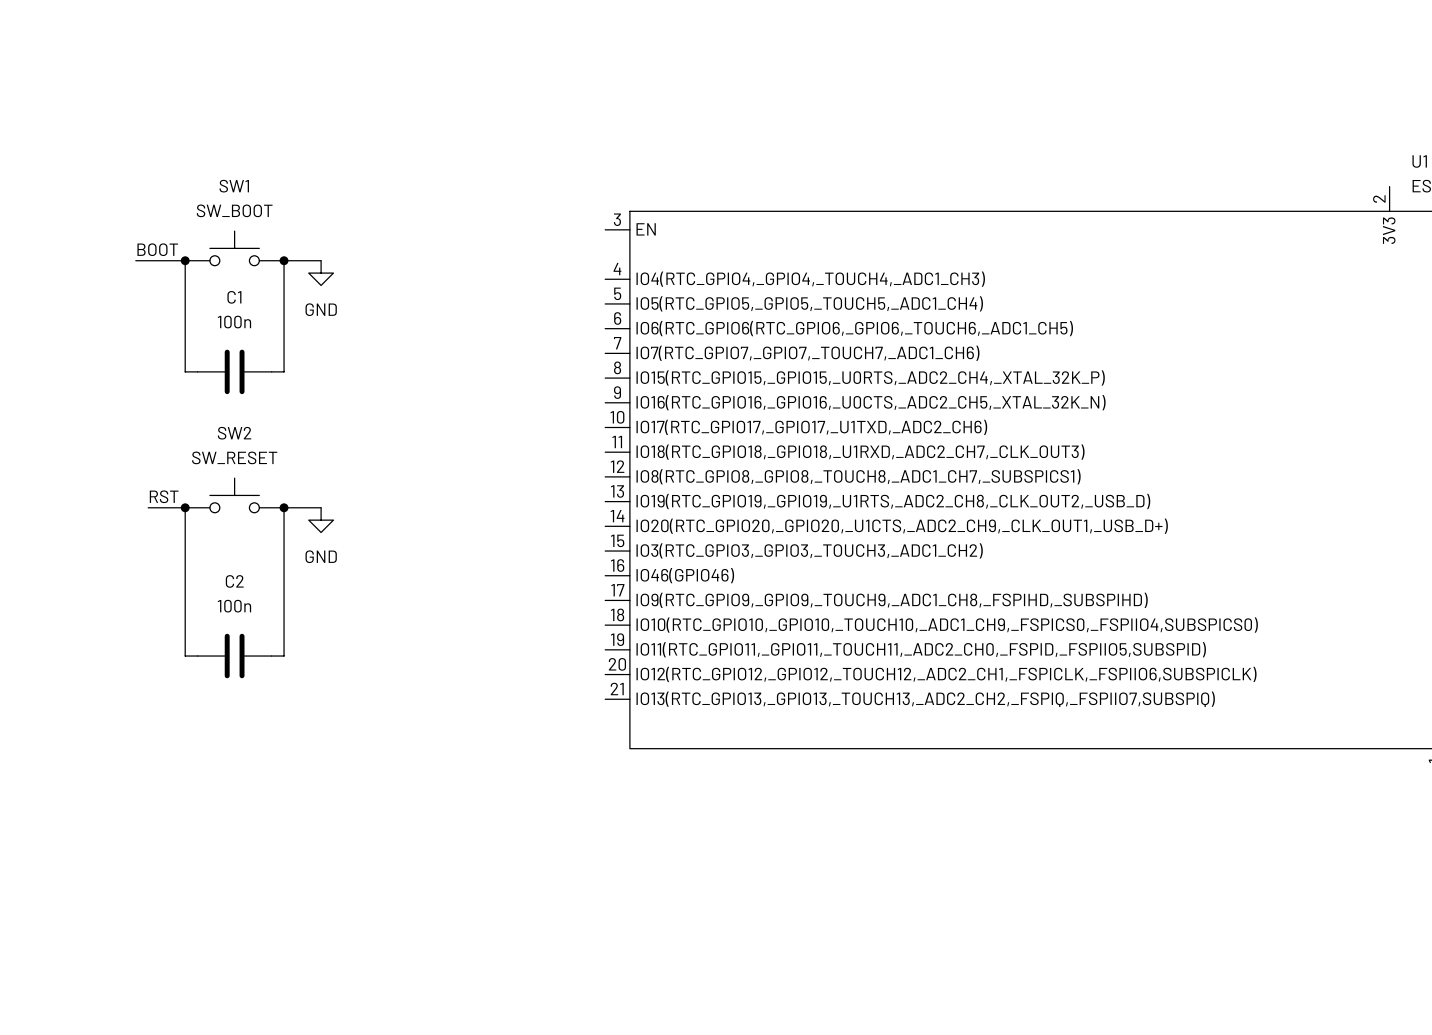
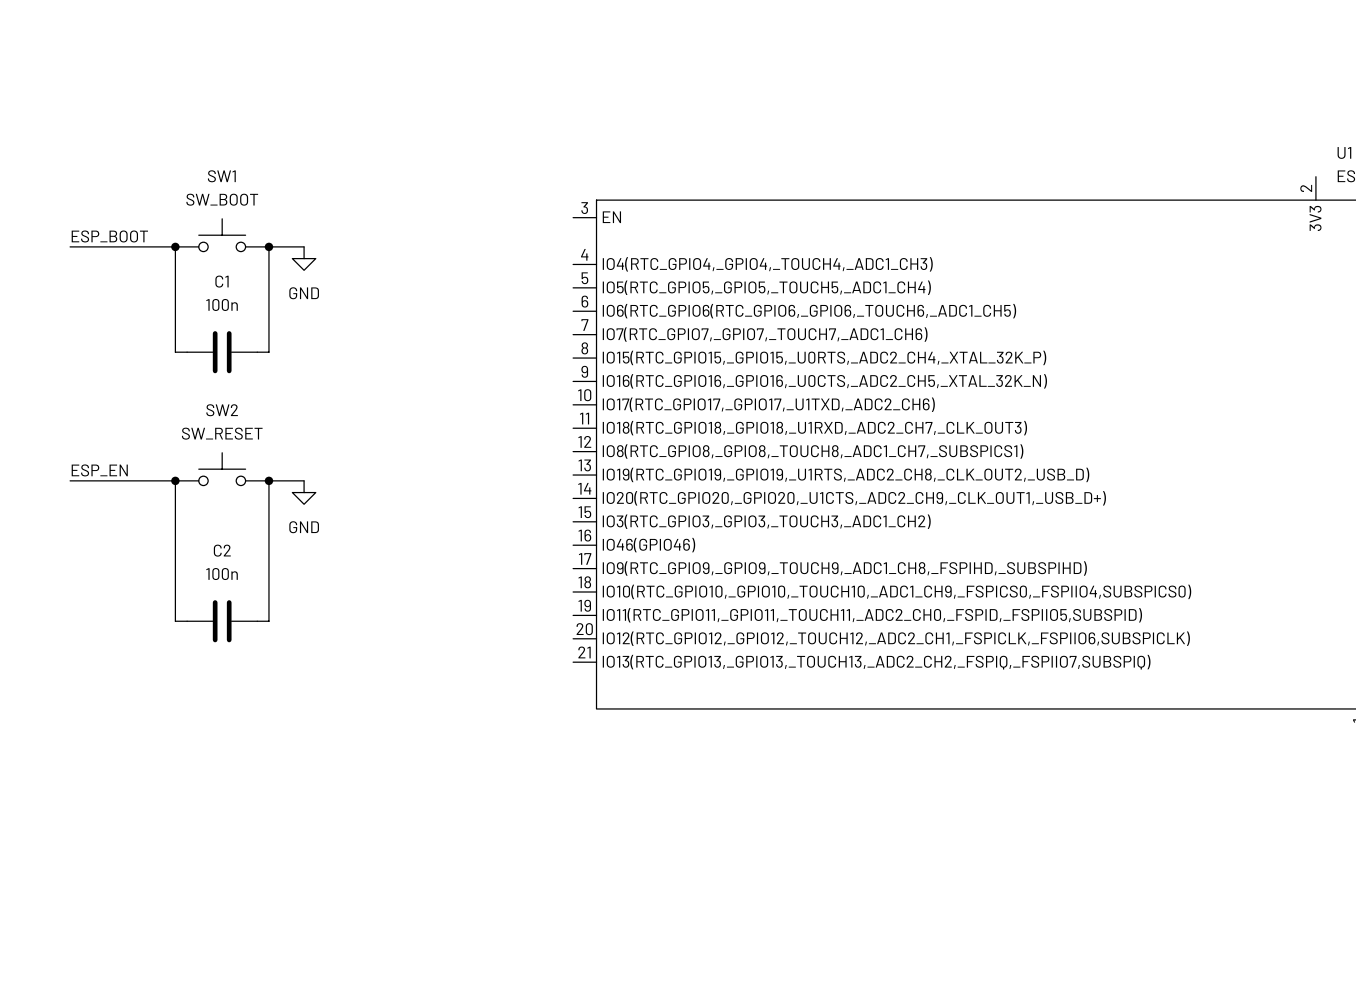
label: BOOT (157, 249) -> ESP_BOOT (109, 236)
wire: none -> (70, 246) (128, 246)
label: none -> ESP_EN (99, 470)
label: RST (164, 496) -> none
wire: none -> (70, 480) (140, 480)

